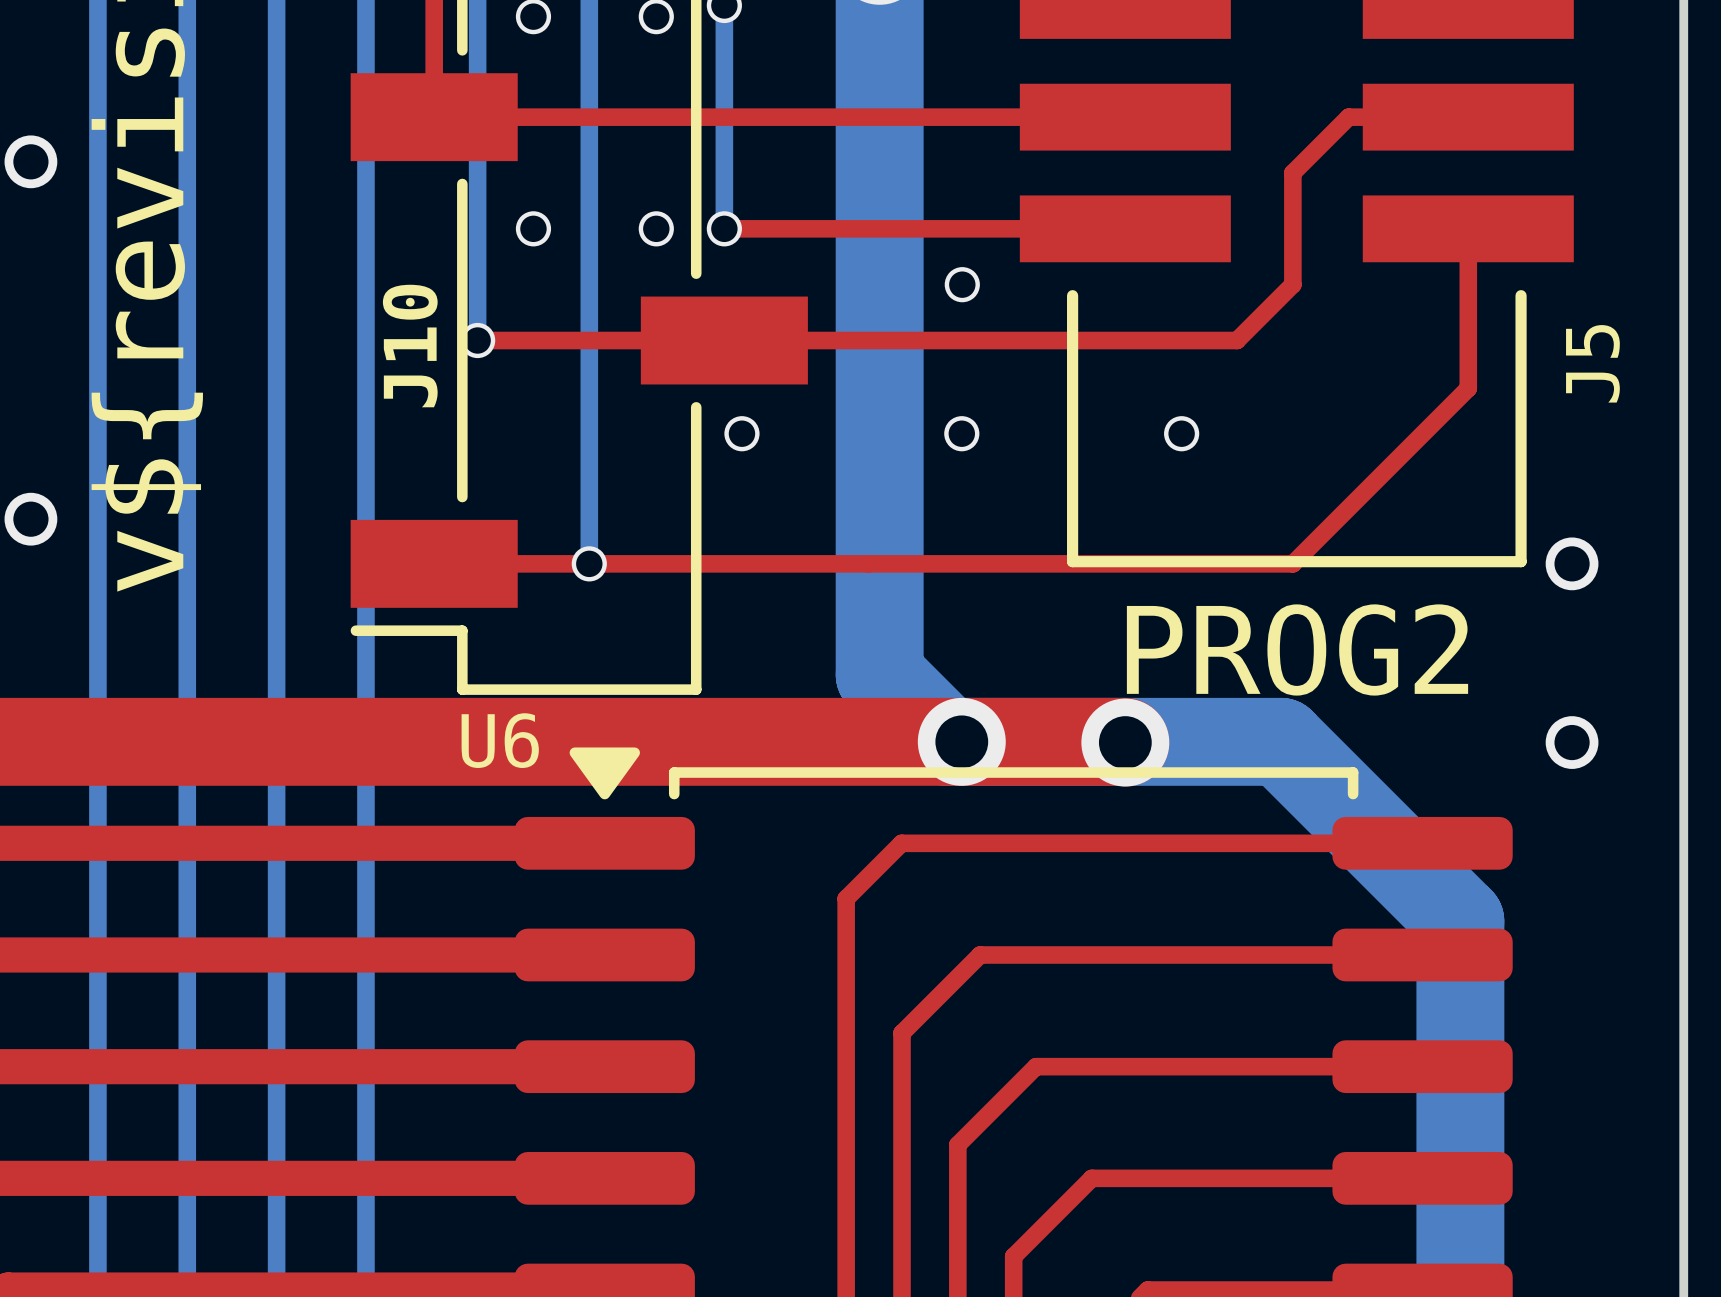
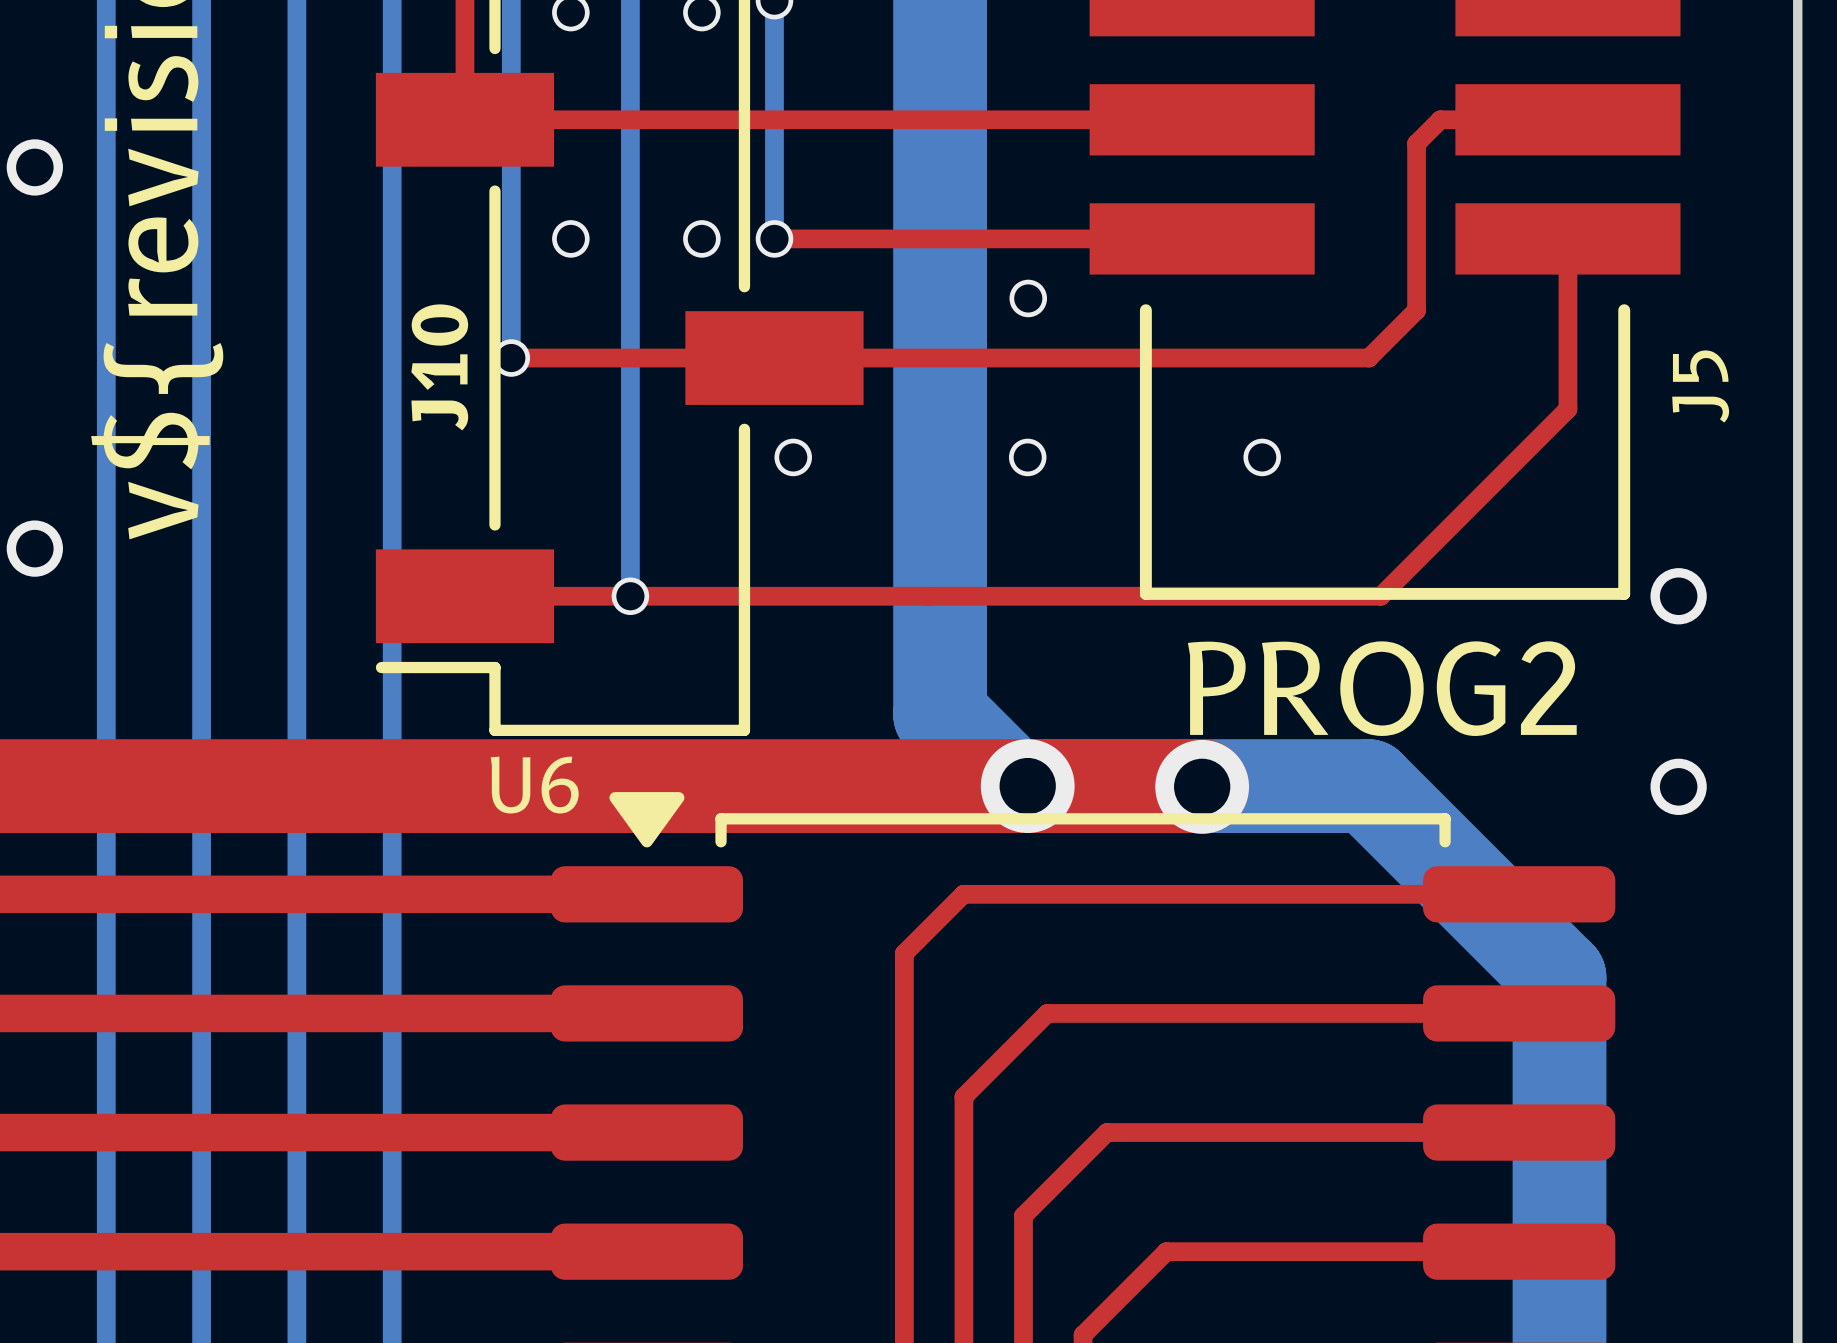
top track: (1326, 139) (1292, 172) (1292, 284) (1237, 340) -> (1416, 143) (1416, 310) (1368, 358) (1321, 358)

